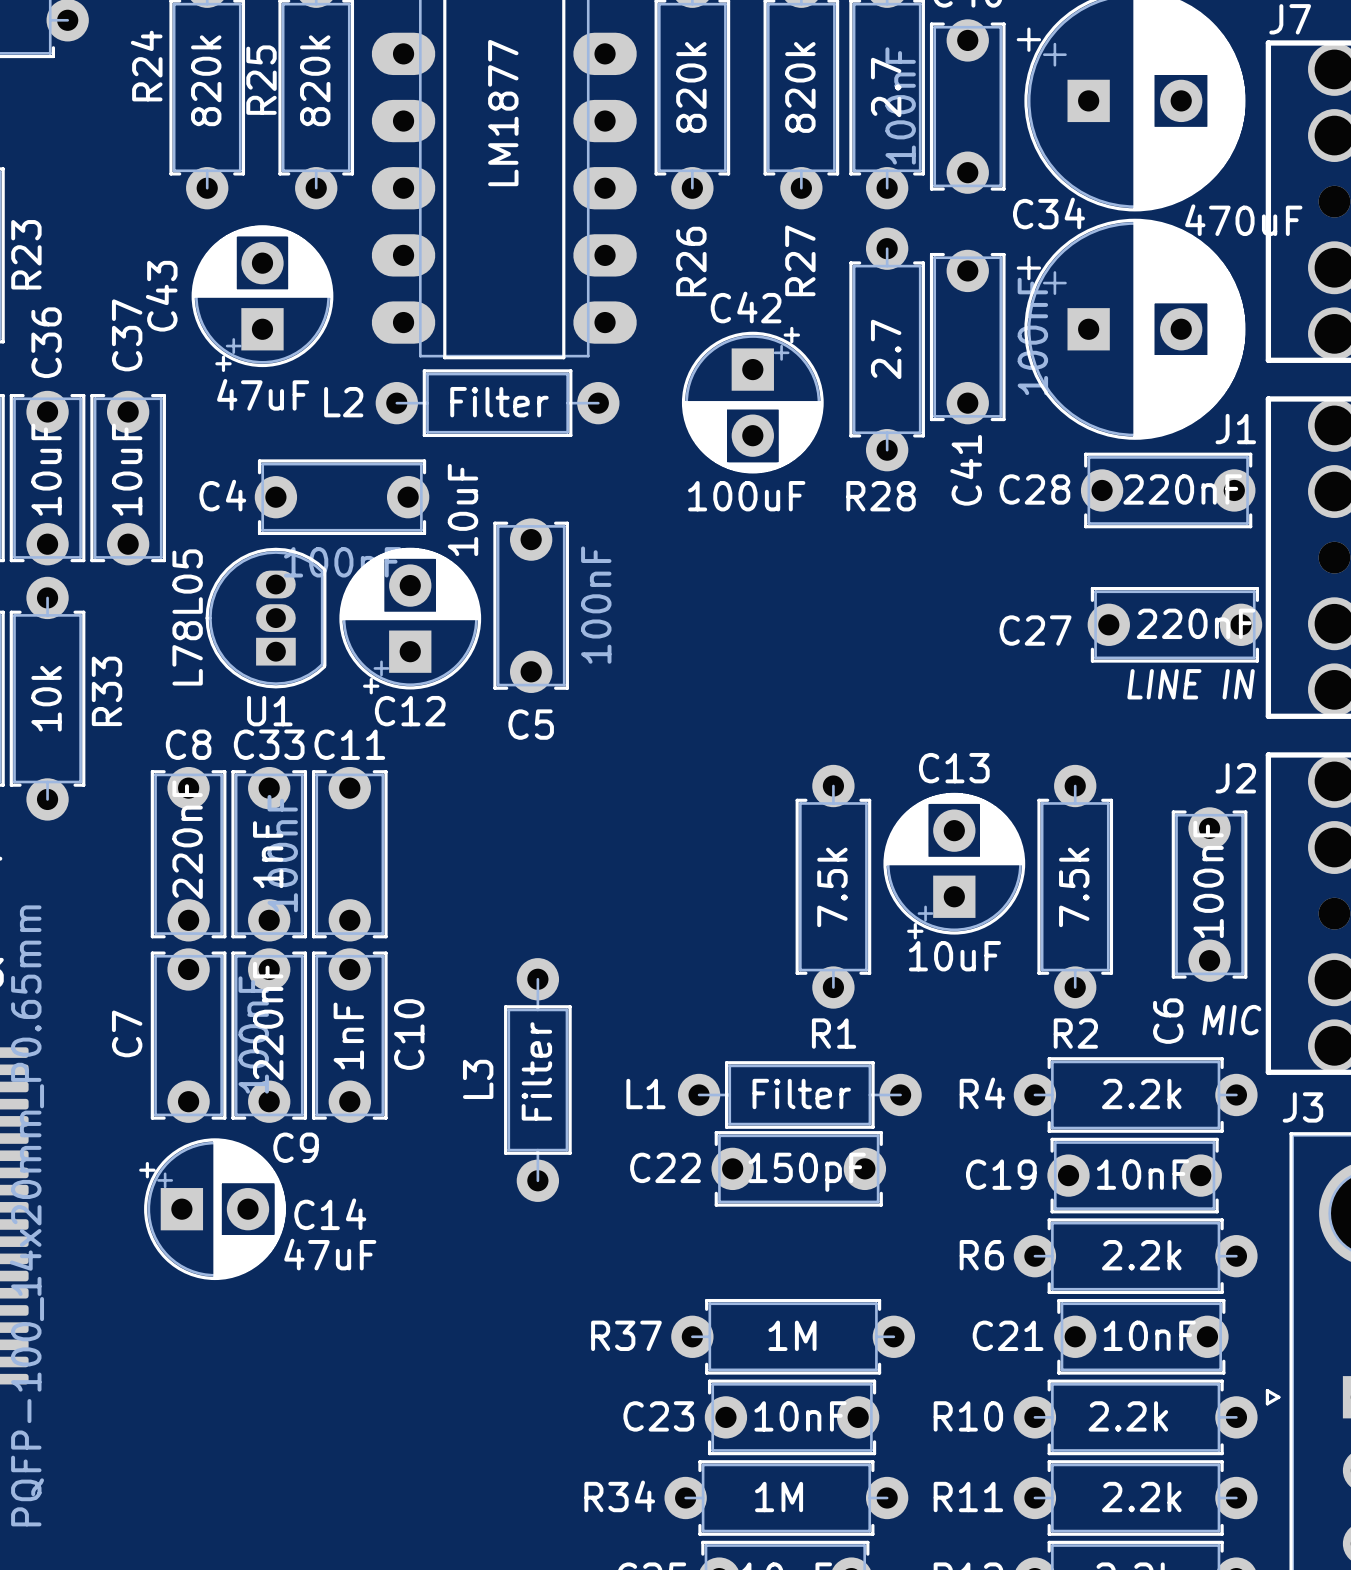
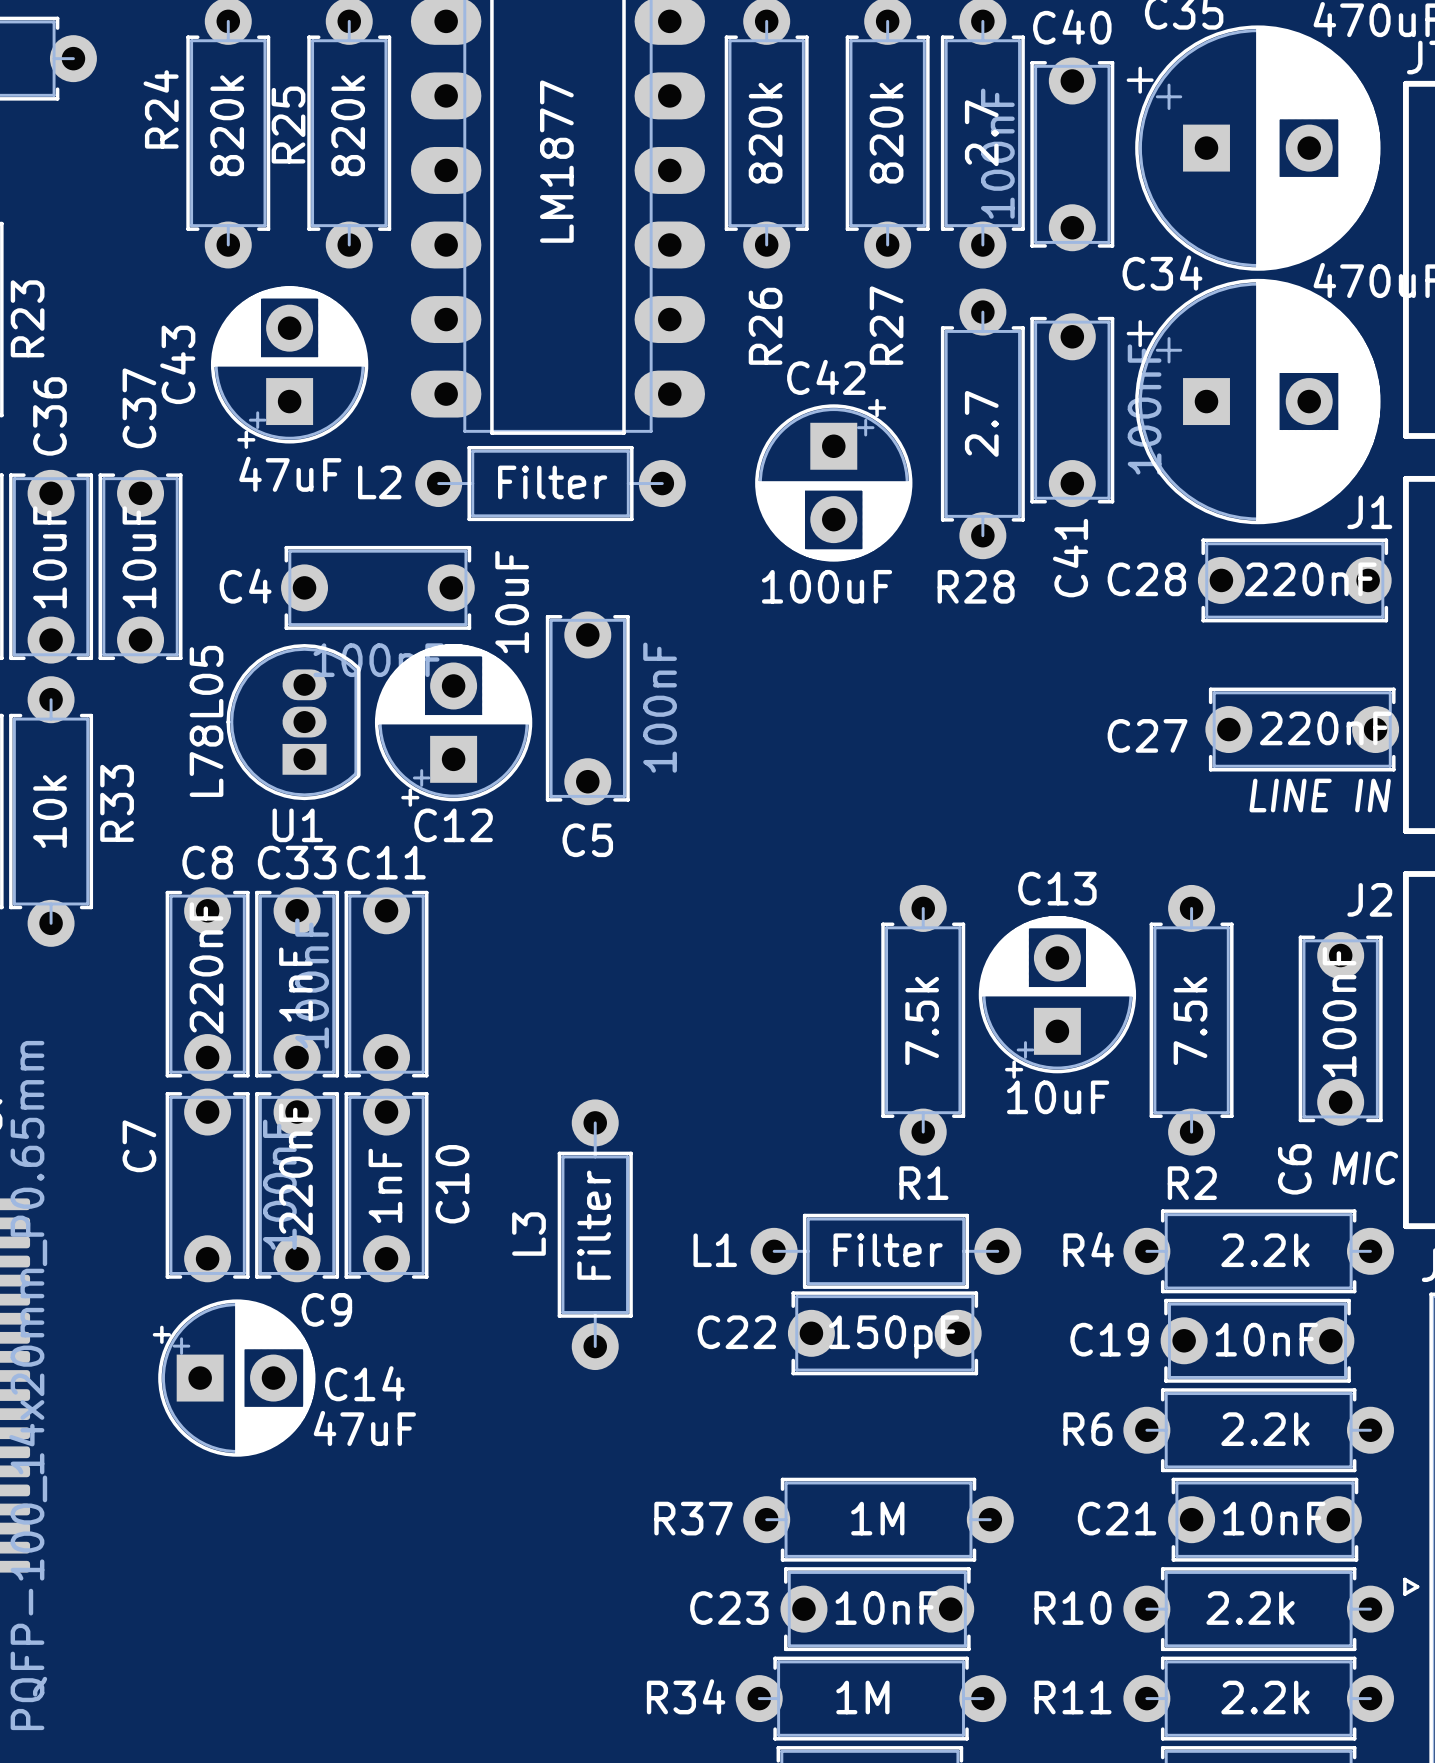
C7 name position: C7 (127, 1033) -> C7 (139, 1146)

